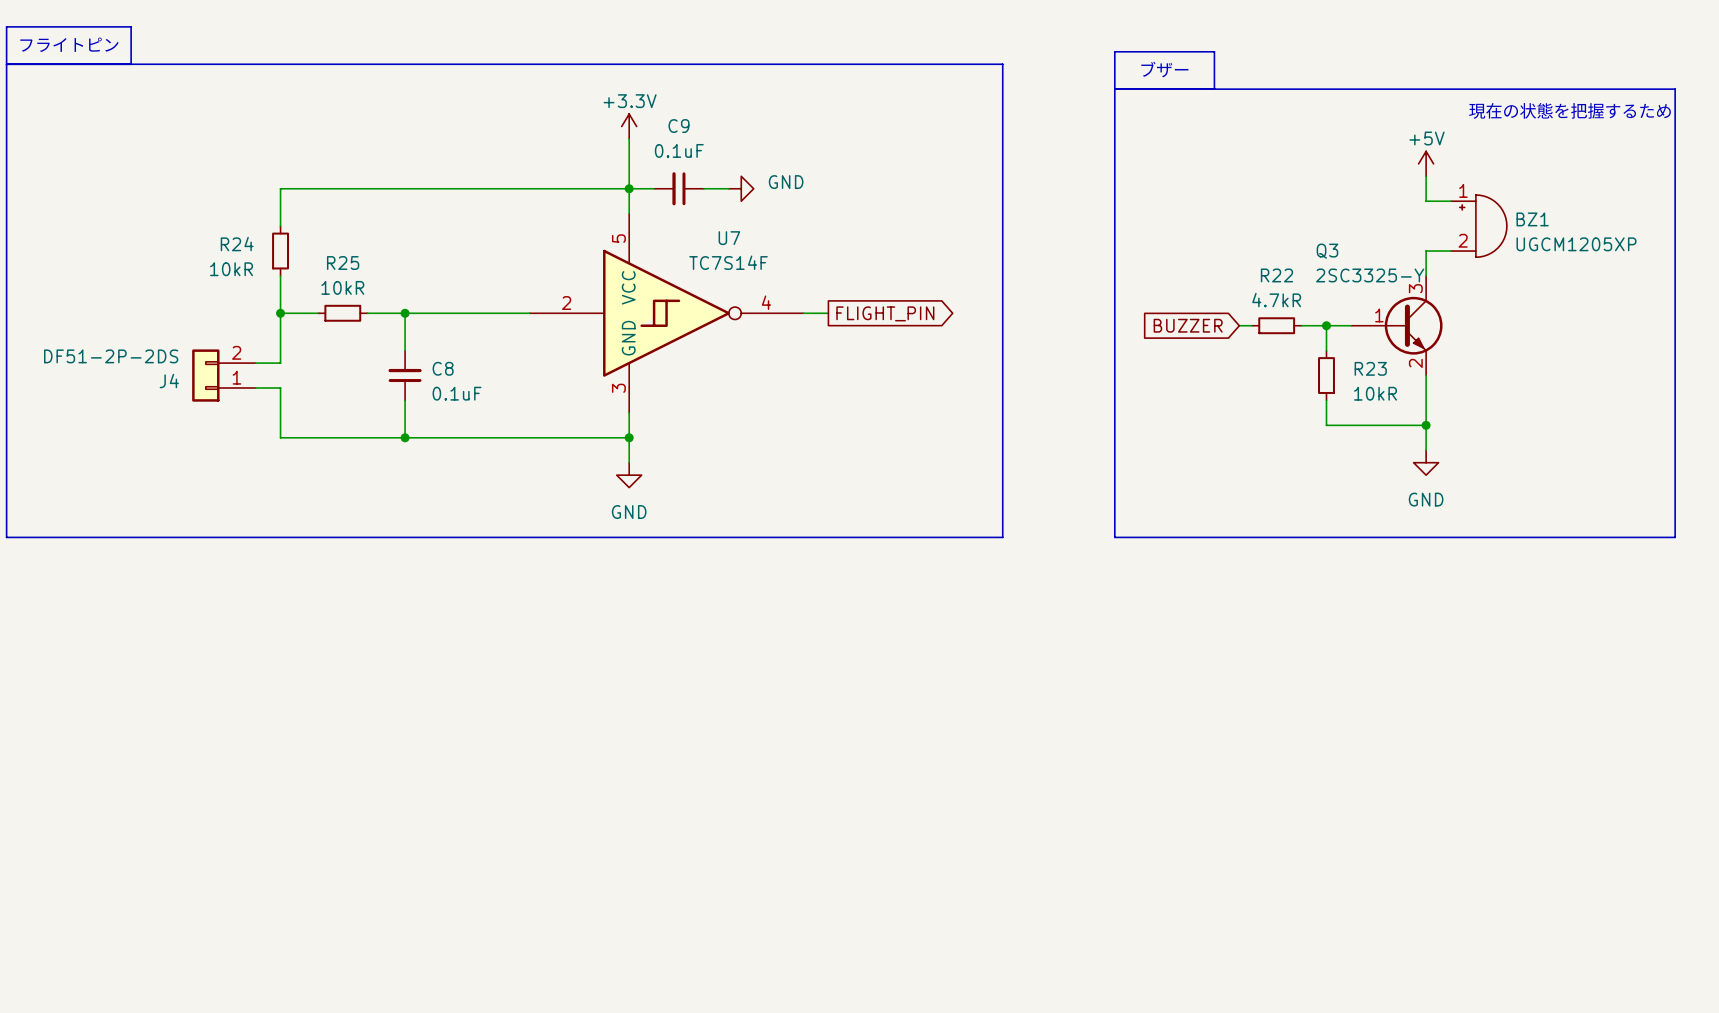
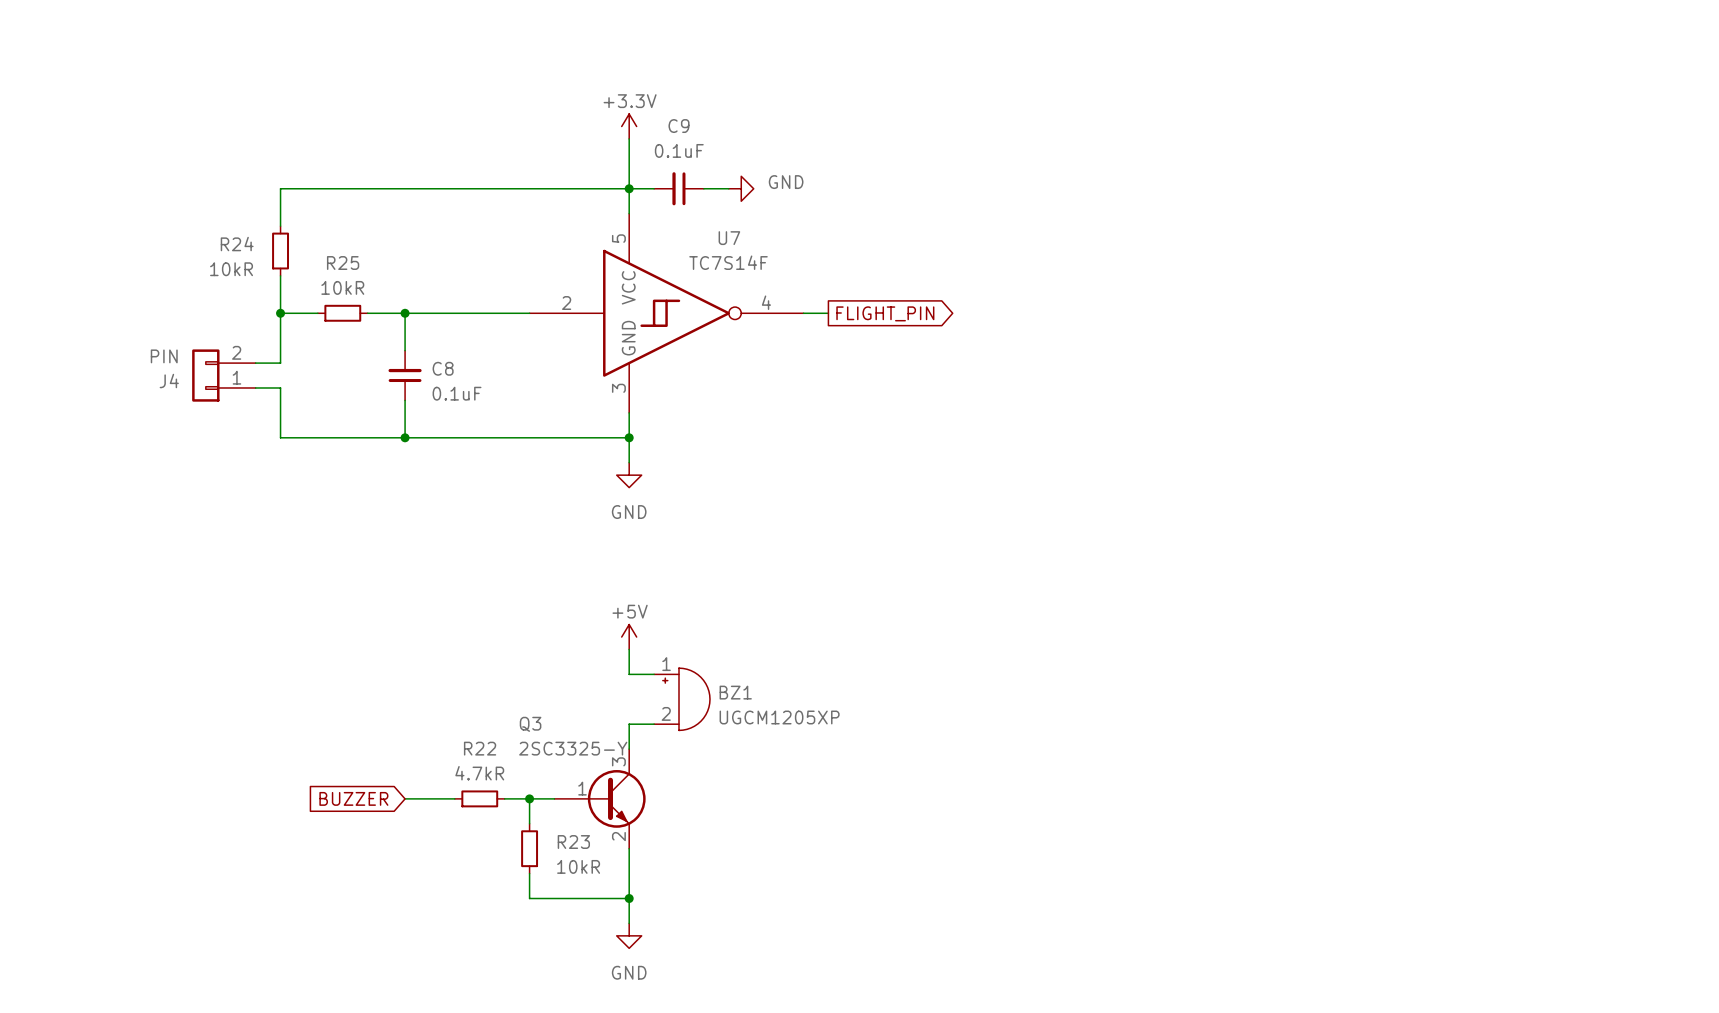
text: フライトピン (69, 44) -> none
line: (6, 64) (1002, 64) (1002, 537) (6, 537) (6, 26) (131, 26) (131, 64) -> none
text: ブザー (1164, 69) -> none
line: (1114, 89) (1675, 89) (1675, 537) (1114, 537) (1114, 51) (1214, 51) (1214, 89) -> none
text: 現在の状態を把握するため (1570, 110) -> none
power symbol: +5V (1426, 163) -> none
wire: (1426, 176) (1426, 201) (1451, 201) -> none
BZ1 position: (1478, 226) -> (682, 699)
wire: (1451, 251) (1426, 251) (1426, 275) -> none
global label: BUZZER (1188, 325) -> none
wire: (1239, 325) (1251, 325) -> none
R22 position: (1276, 325) -> (479, 798)
wire: (1301, 325) (1351, 325) -> none
wire: (1326, 325) (1326, 350) -> none
junction: (1326, 325) -> none
Q3 position: (1396, 325) -> (600, 798)
J4 value: DF51-2P-2DS (111, 356) -> PIN (164, 356)
R23 position: (1326, 375) -> (529, 848)
wire: (1426, 375) (1426, 450) -> none
wire: (1326, 400) (1326, 425) (1426, 425) -> none
junction: (1426, 425) -> none
power symbol: GND (1426, 462) -> none
power symbol: none -> +5V (629, 637)
wire: none -> (629, 649) (629, 674) (654, 674)
wire: none -> (654, 724) (629, 724) (629, 749)
global label: none -> BUZZER (353, 798)
wire: none -> (405, 798) (454, 798)
wire: none -> (504, 798) (554, 798)
wire: none -> (529, 798) (529, 823)
junction: none -> (529, 798)
wire: none -> (629, 848) (629, 923)
wire: none -> (529, 873) (529, 898) (629, 898)
junction: none -> (629, 898)
power symbol: none -> GND (629, 935)

